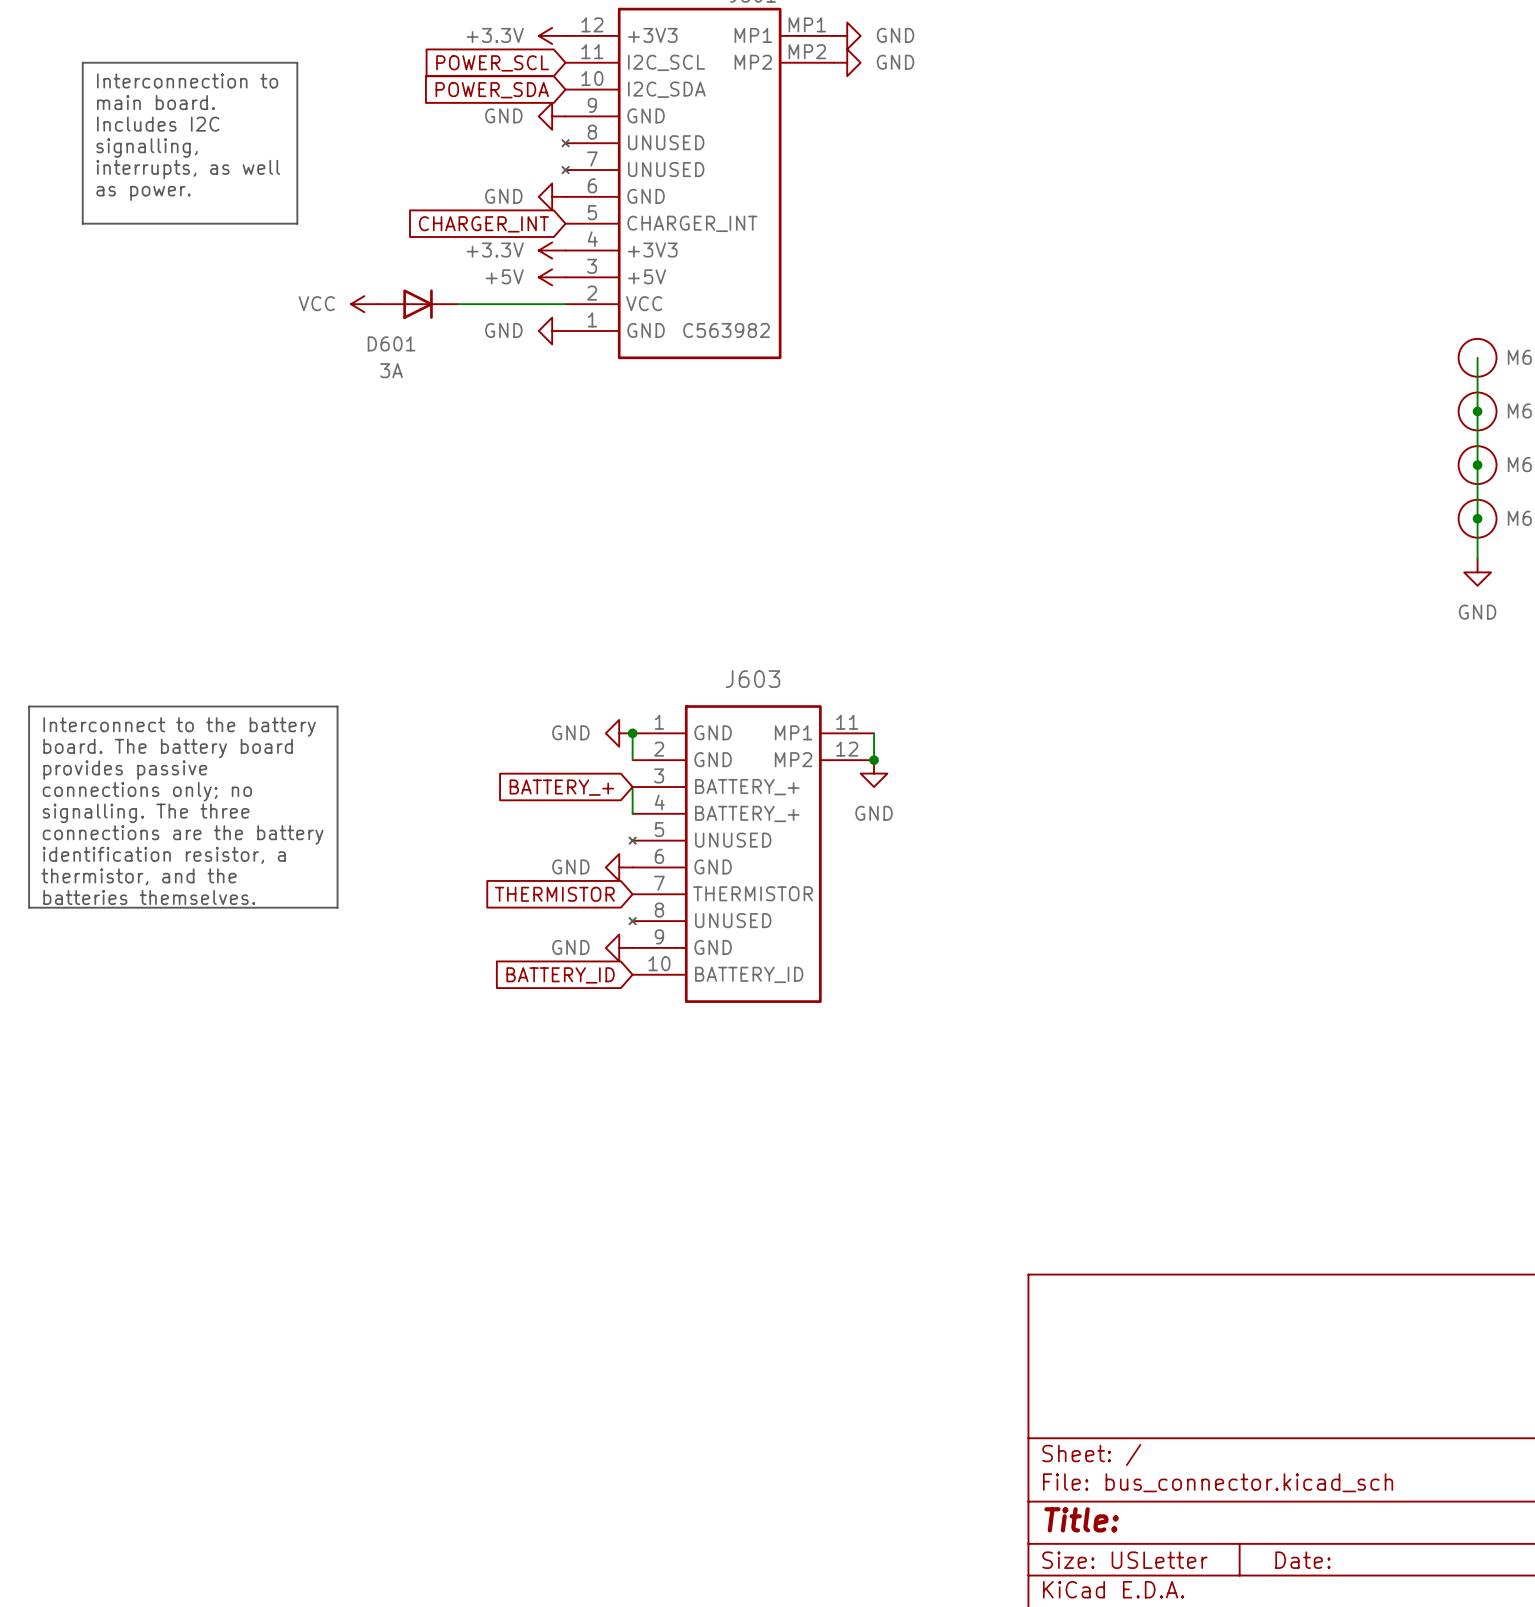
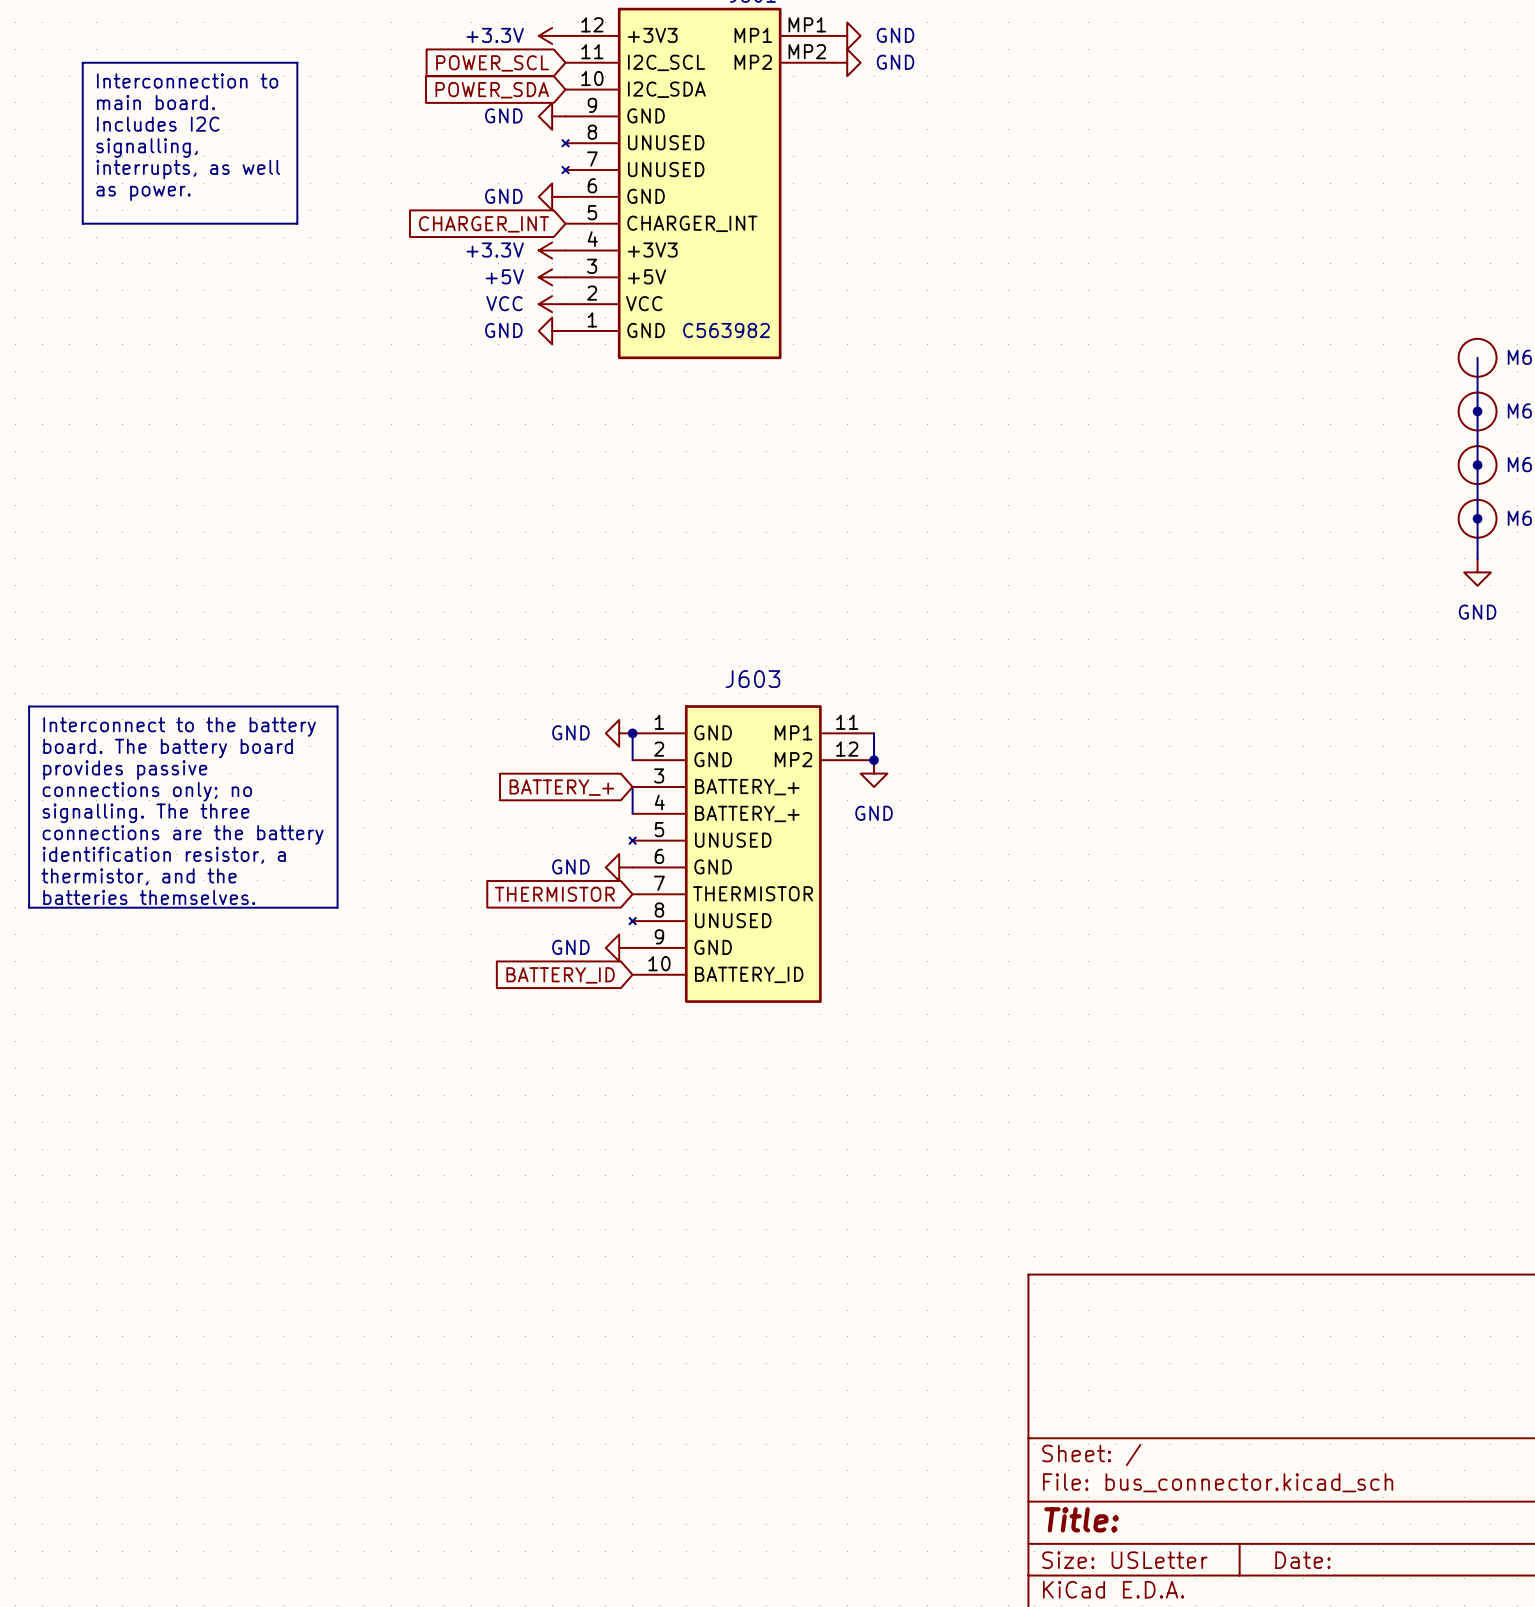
power symbol position: VCC (364, 304) -> VCC (552, 304)
D601: 3A (418, 304) -> none
wire: (458, 304) (565, 304) -> none

